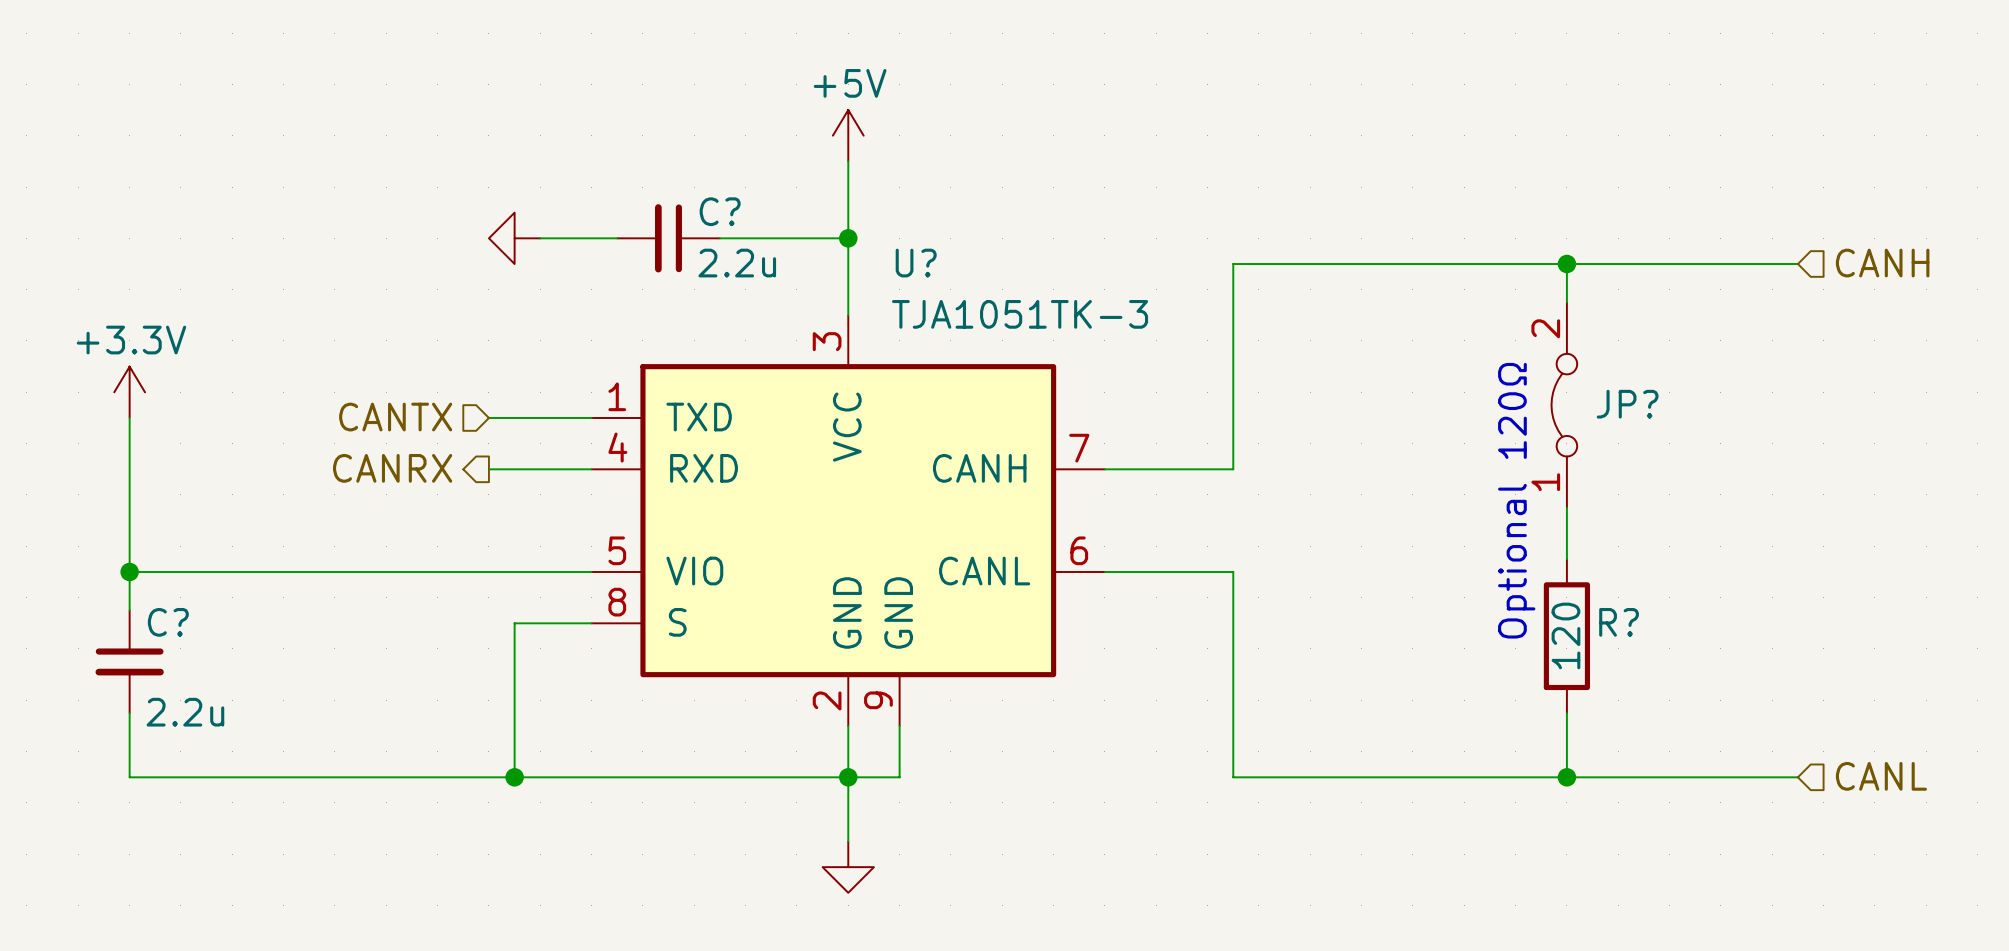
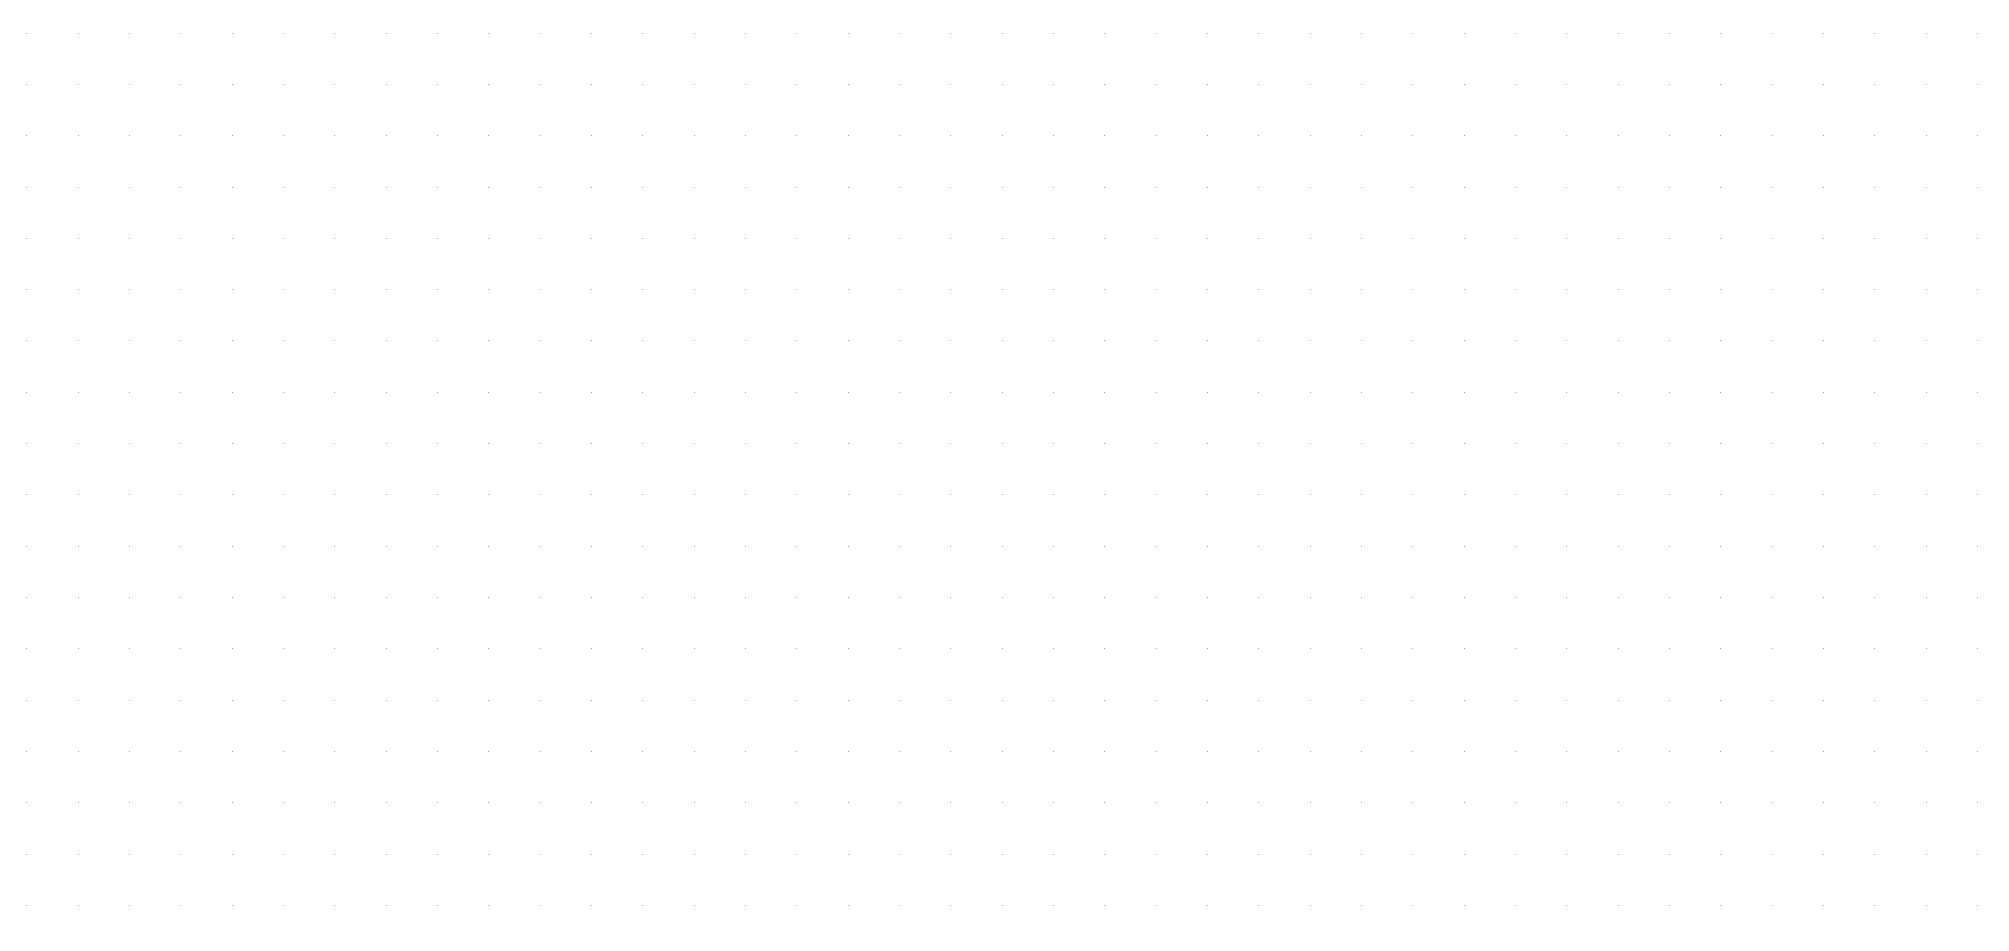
power symbol: +5V (848, 135) -> none
wire: (848, 161) (848, 315) -> none
power symbol: (514, 238) -> none
wire: (540, 238) (617, 238) -> none
C?: 2.2u (668, 238) -> none
wire: (719, 238) (848, 238) -> none
junction: (848, 238) -> none
hierarchical label: CANH (1882, 263) -> none
wire: (1566, 264) (1566, 302) -> none
junction: (1566, 264) -> none
wire: (1797, 264) (1233, 264) (1233, 469) (1104, 469) -> none
power symbol: +3.3V (129, 392) -> none
JP?: (1564, 405) -> none
wire: (129, 417) (129, 610) -> none
hierarchical label: CANTX (395, 417) -> none
wire: (488, 417) (591, 417) -> none
hierarchical label: CANRX (392, 468) -> none
wire: (488, 469) (591, 469) -> none
text: Optional 120Ω (1516, 500) -> none
wire: (1566, 507) (1566, 559) -> none
U?: TJA1051TK-3 (848, 520) -> none
wire: (129, 571) (591, 571) -> none
junction: (129, 571) -> none
wire: (1104, 571) (1233, 571) (1233, 777) (1797, 777) -> none
wire: (591, 623) (514, 623) (514, 777) -> none
R?: 120 (1566, 636) -> none
C?: 2.2u (129, 661) -> none
wire: (129, 713) (129, 777) (899, 777) (899, 725) -> none
wire: (1566, 713) (1566, 777) -> none
wire: (848, 725) (848, 841) -> none
hierarchical label: CANL (1881, 776) -> none
junction: (514, 777) -> none
junction: (848, 777) -> none
junction: (1566, 777) -> none
power symbol: (848, 867) -> none

